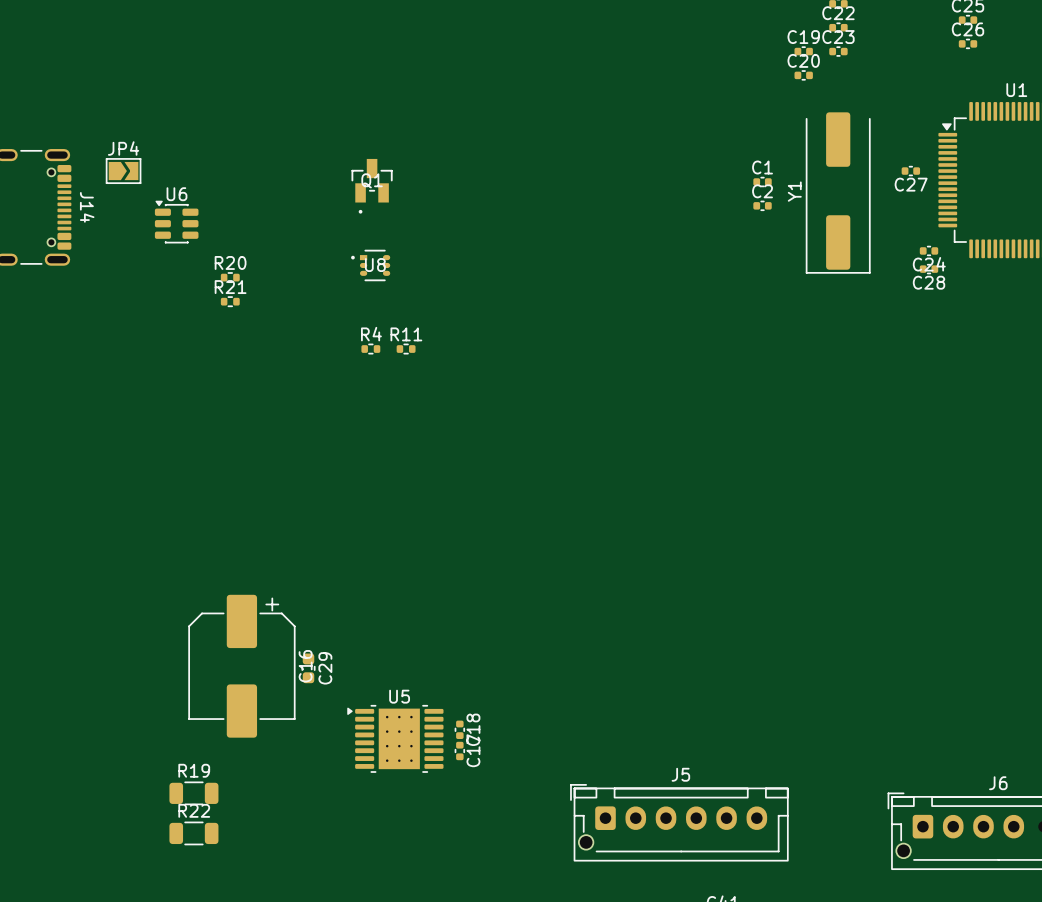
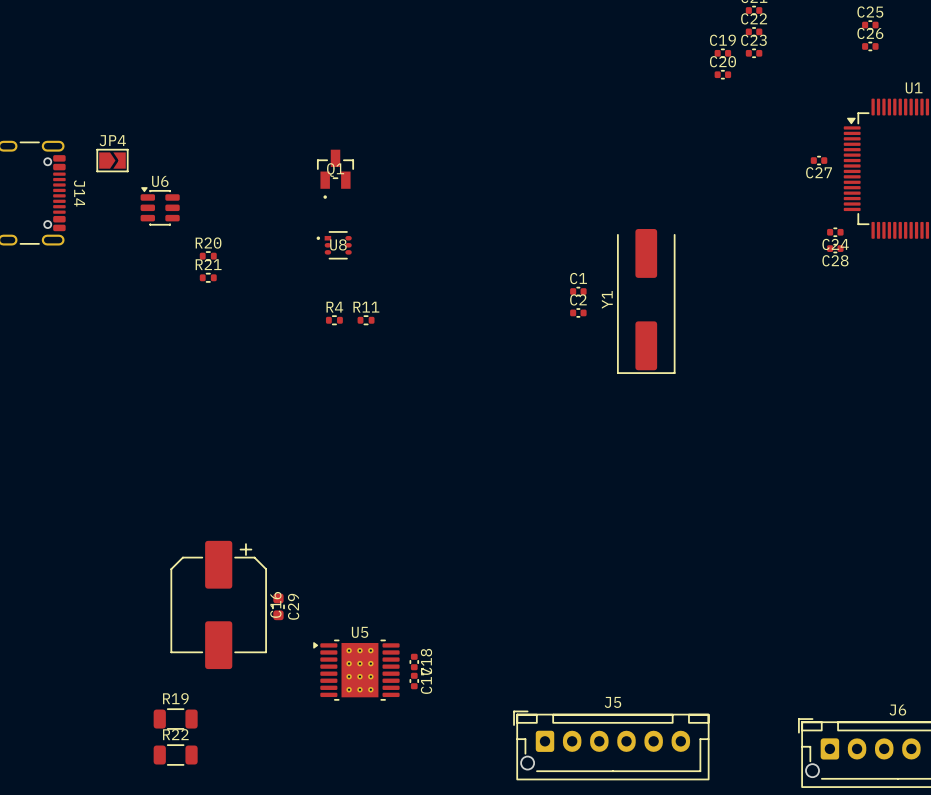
C1 position: (762, 182) -> (578, 291)
Y1 position: (838, 192) -> (646, 301)
C2 position: (762, 205) -> (578, 312)

